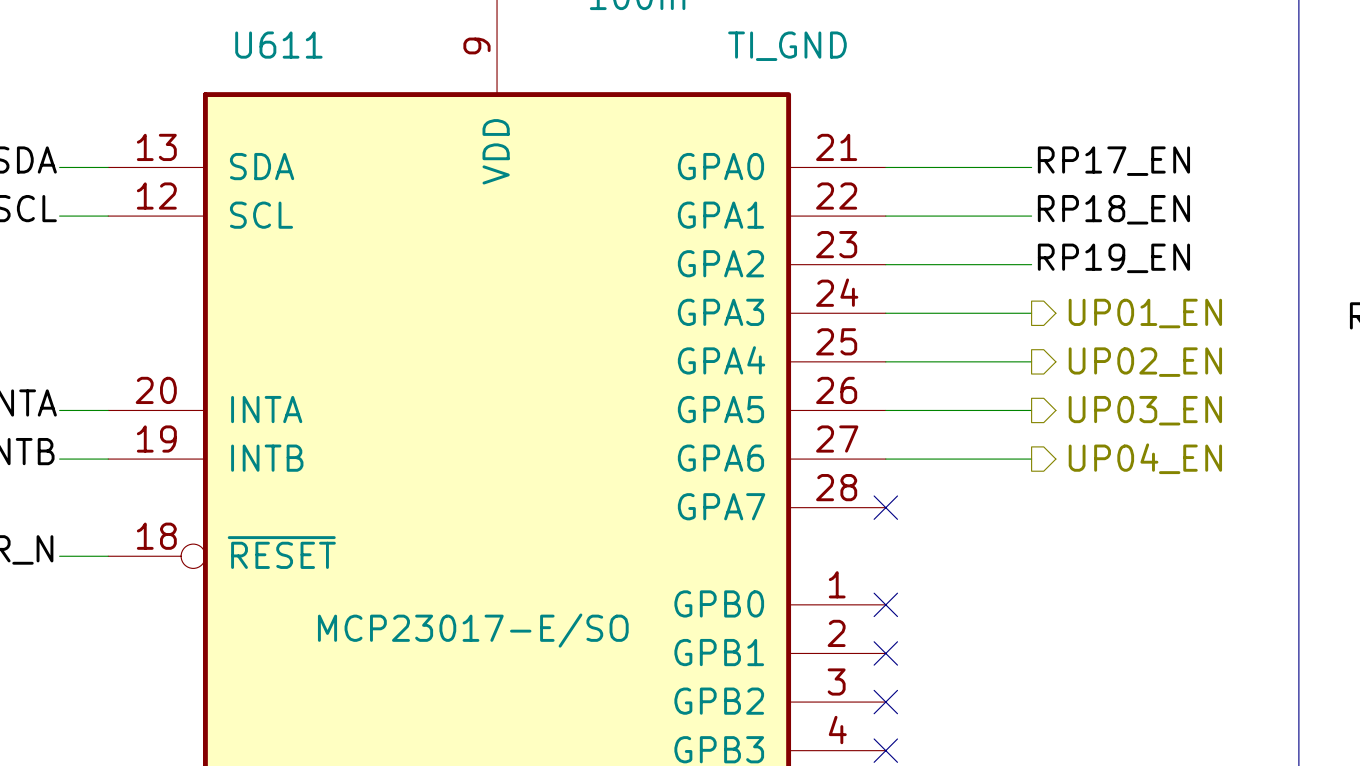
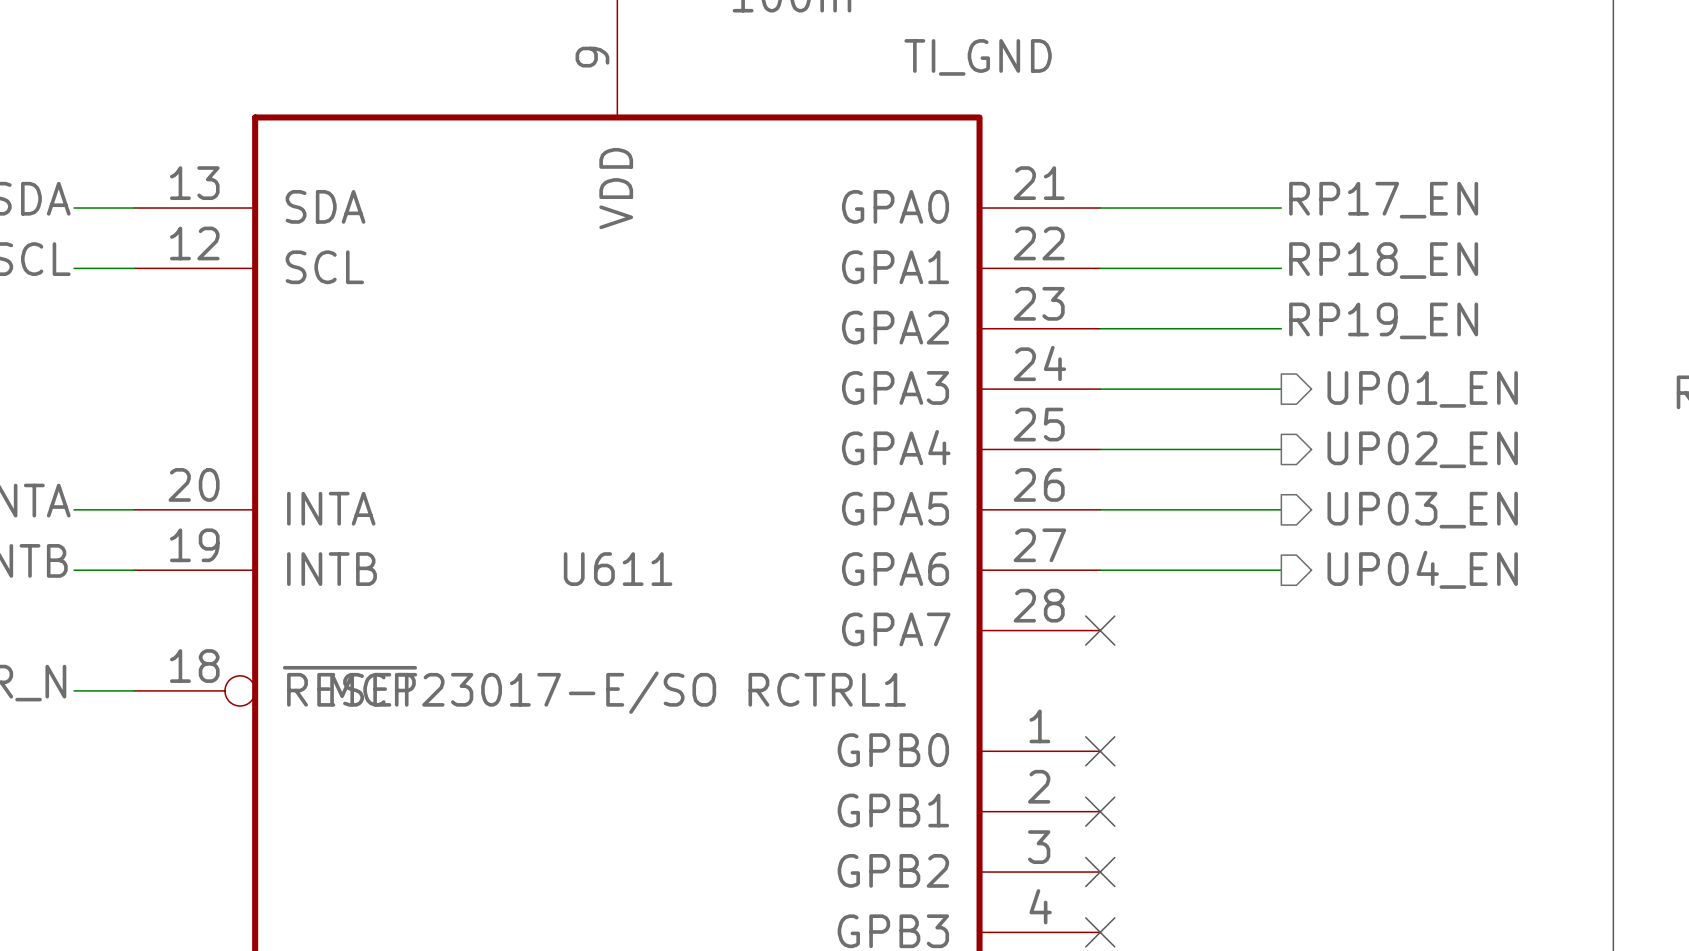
U611 name position: U611 (278, 45) -> U611 (618, 569)
U611 value: none -> MCP23017-E/SO RCTRL1 (618, 692)
U611 text: MCP23017-E/SO (473, 630) -> none

